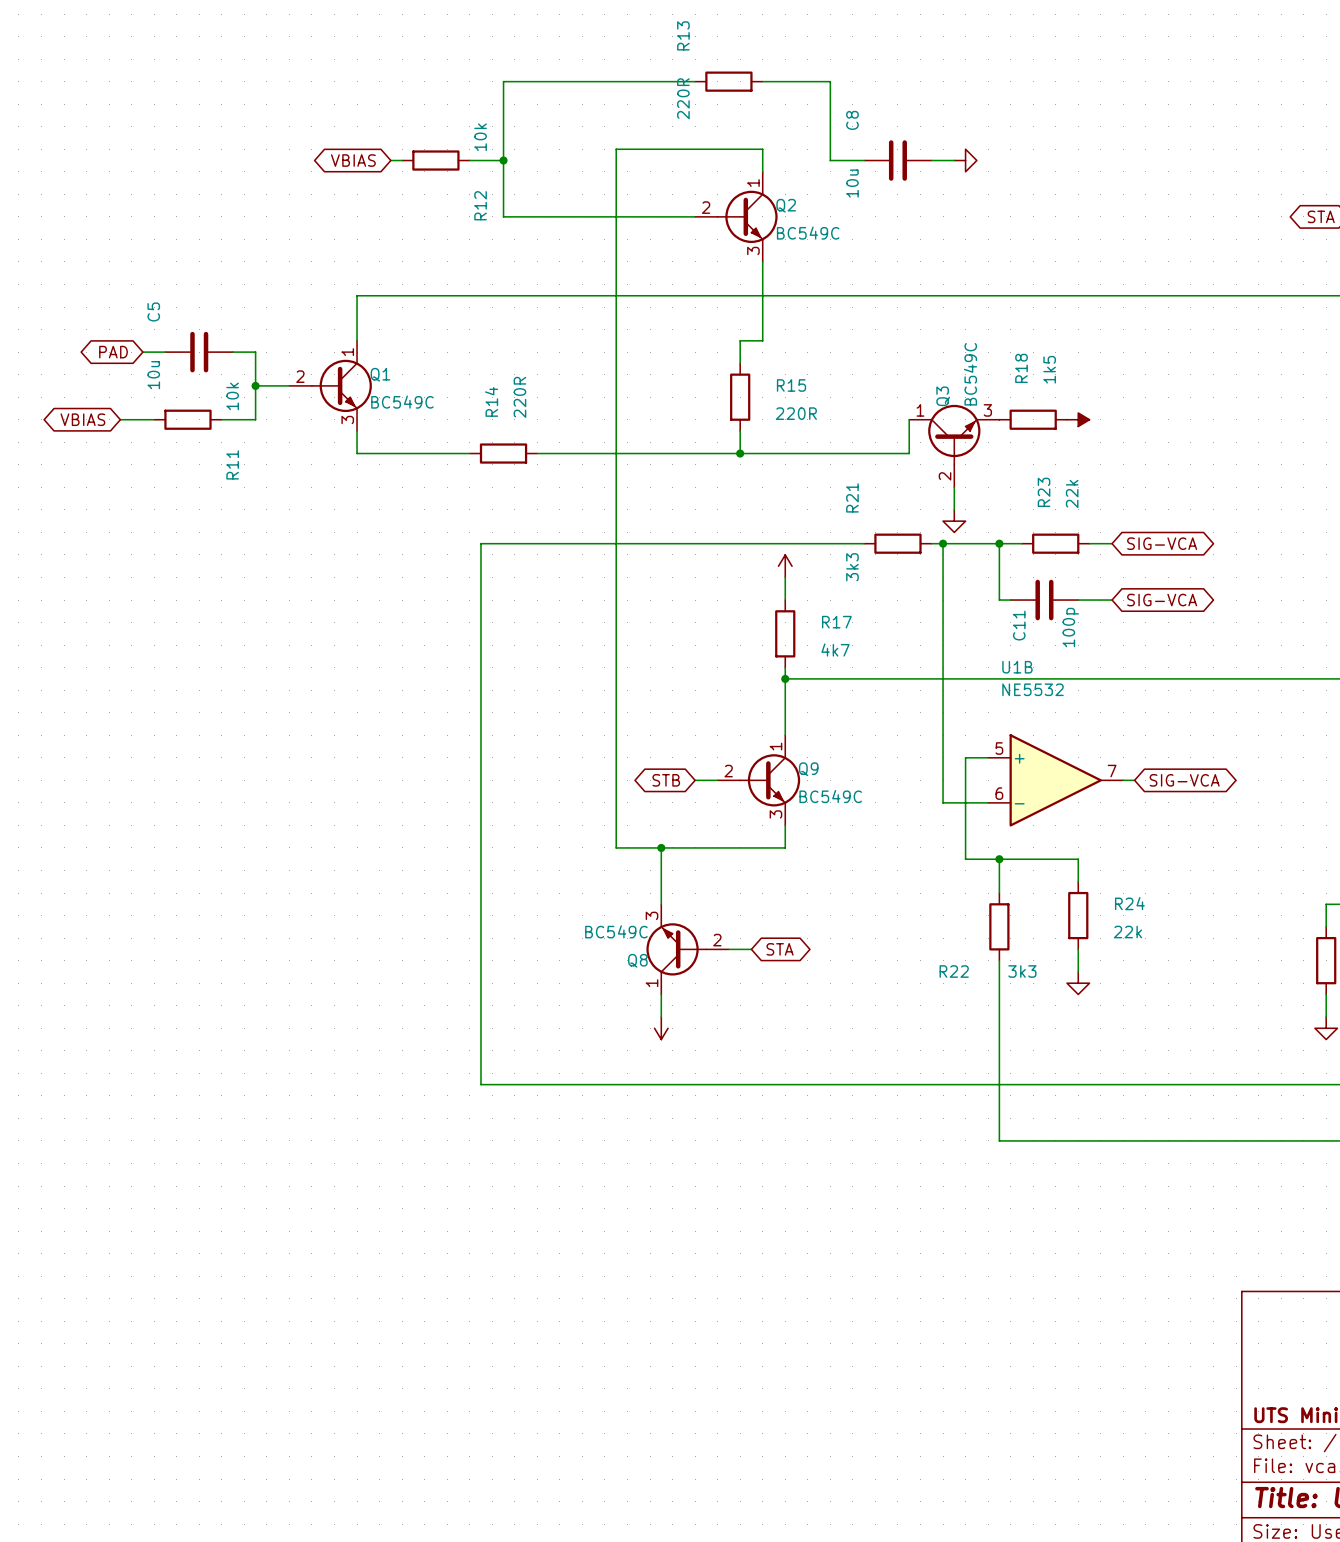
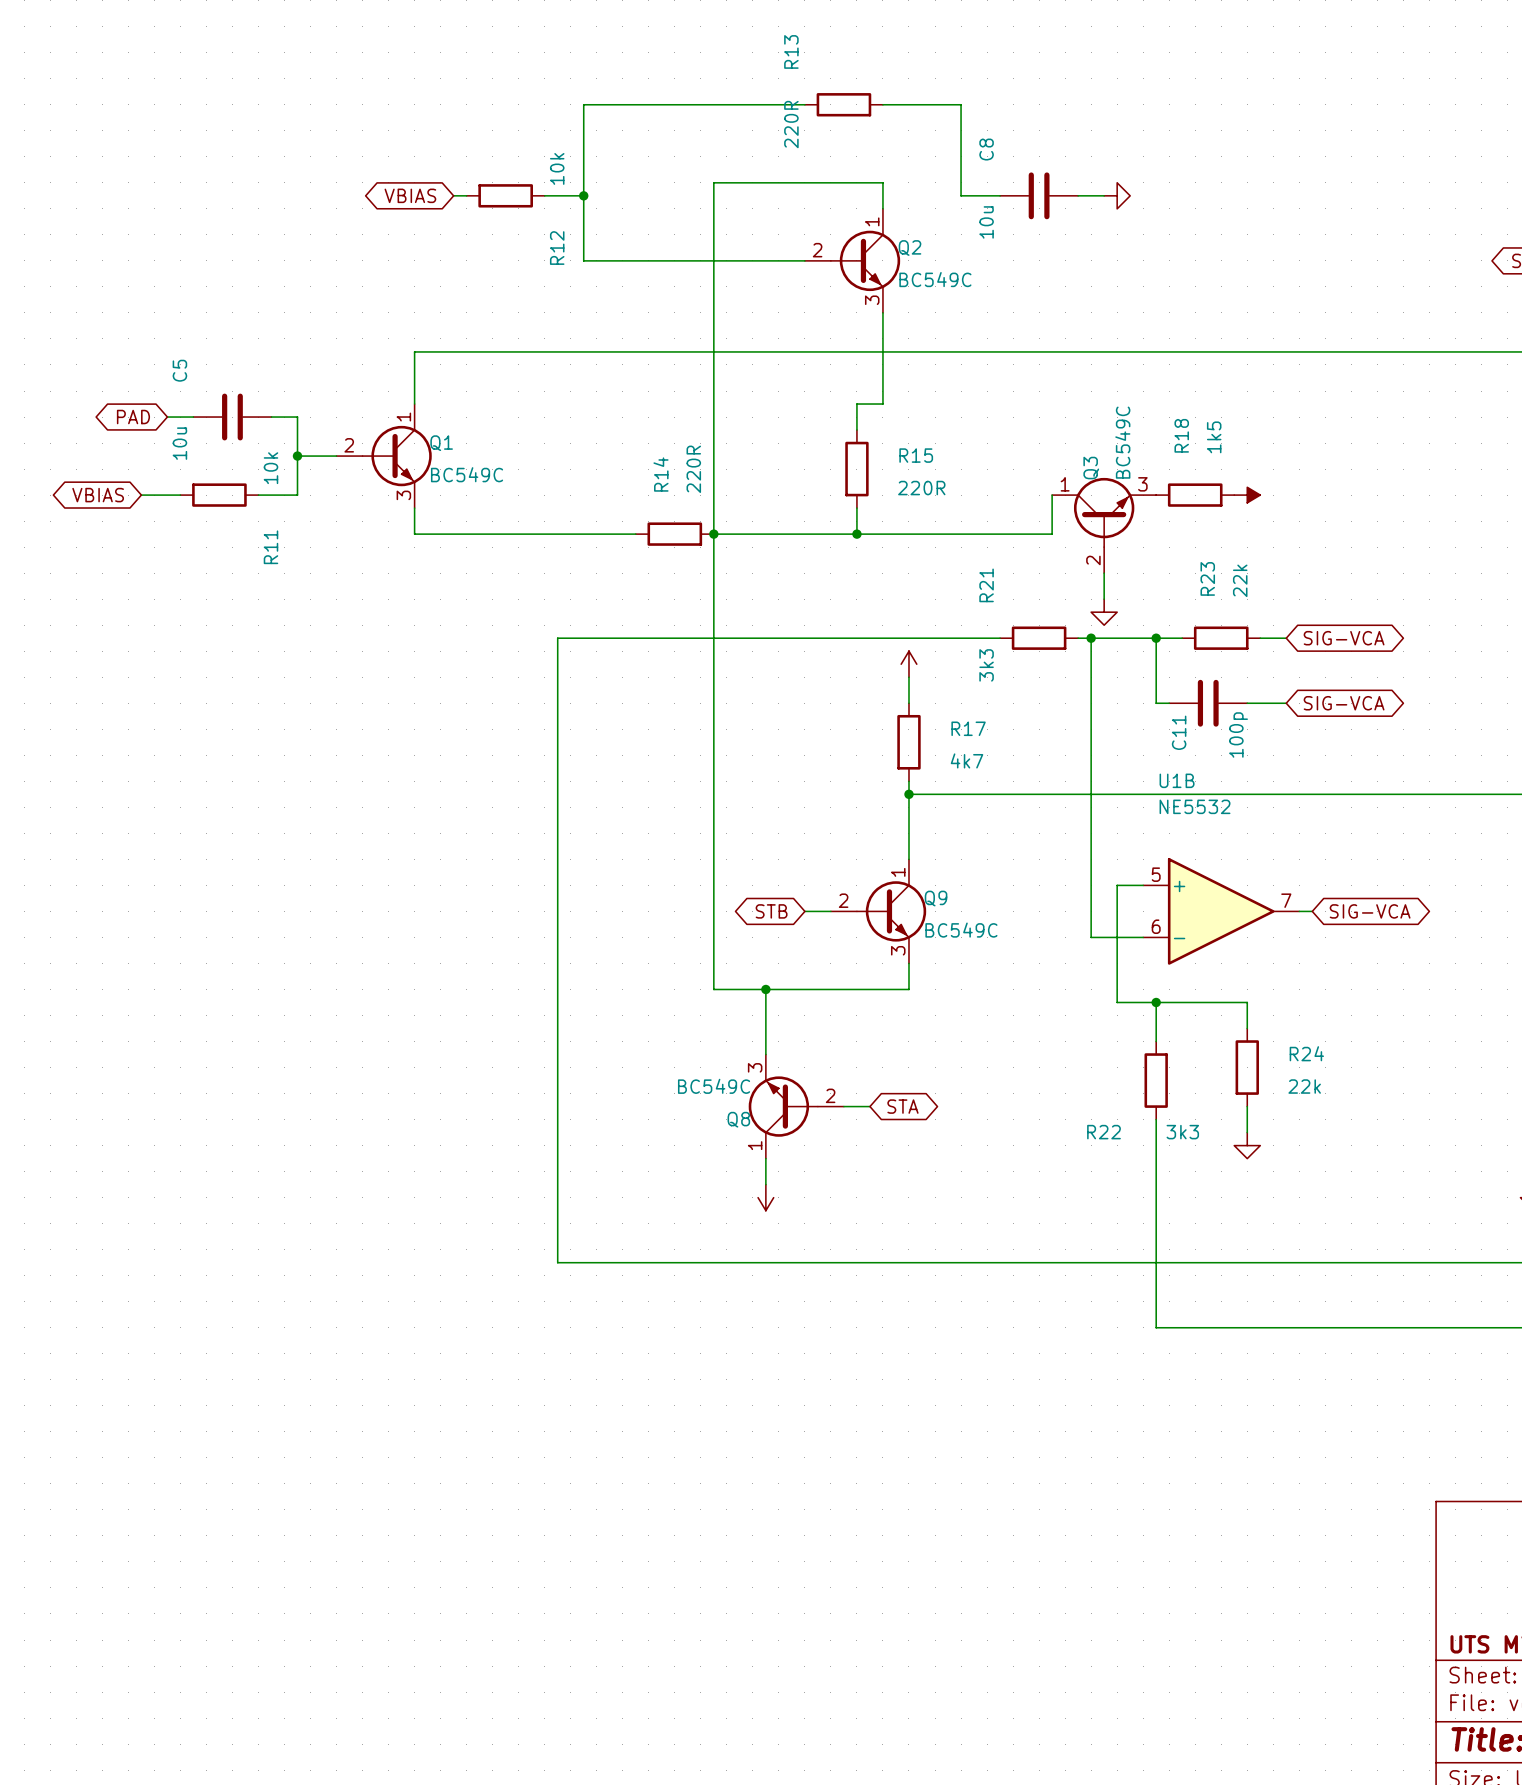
R14 position: (503, 453) -> (674, 534)
wire: (548, 453) (616, 453) -> (544, 534) (622, 534)
junction: none -> (713, 534)

